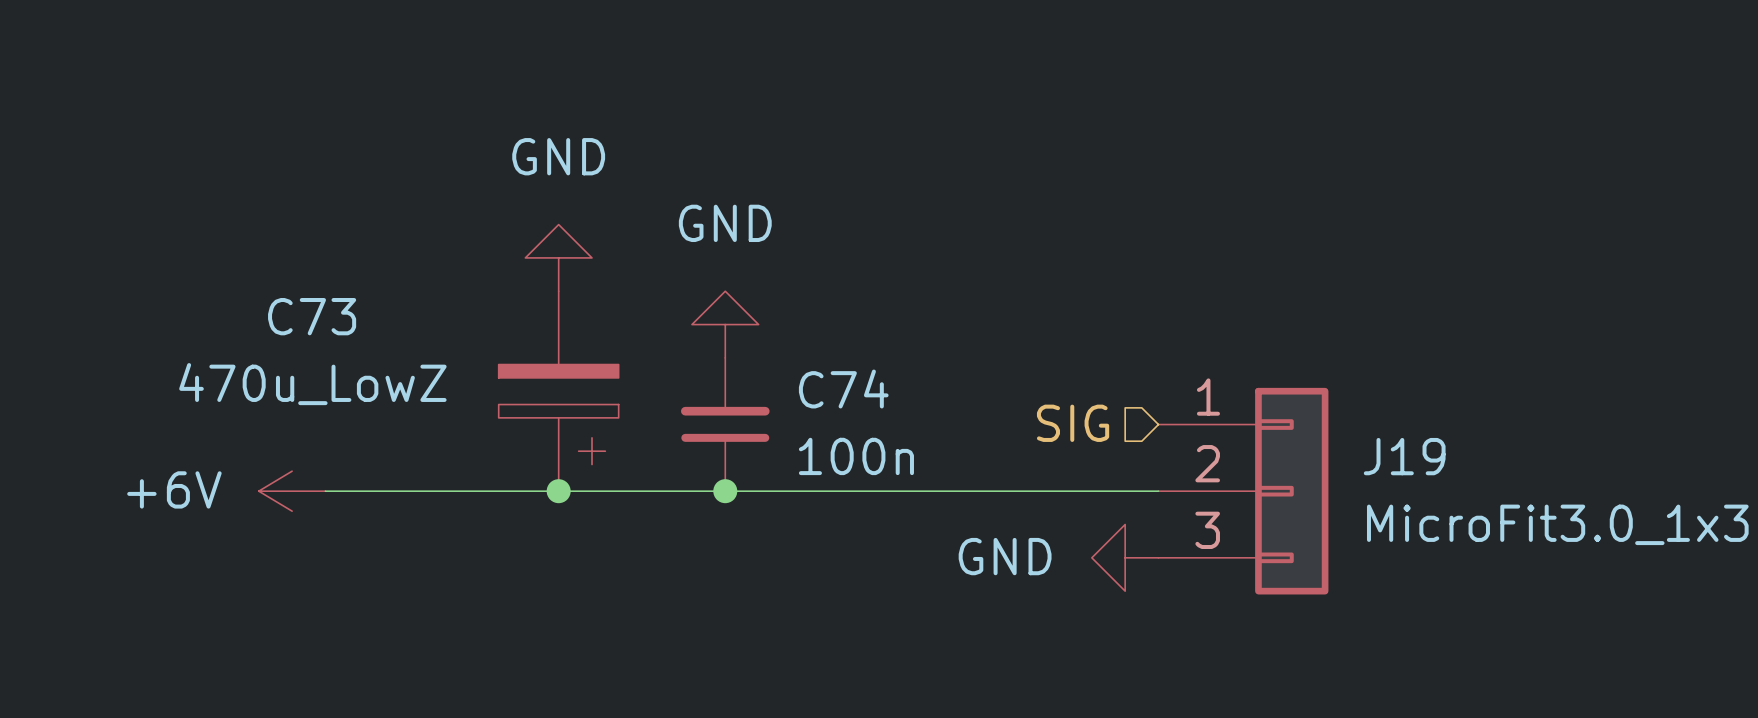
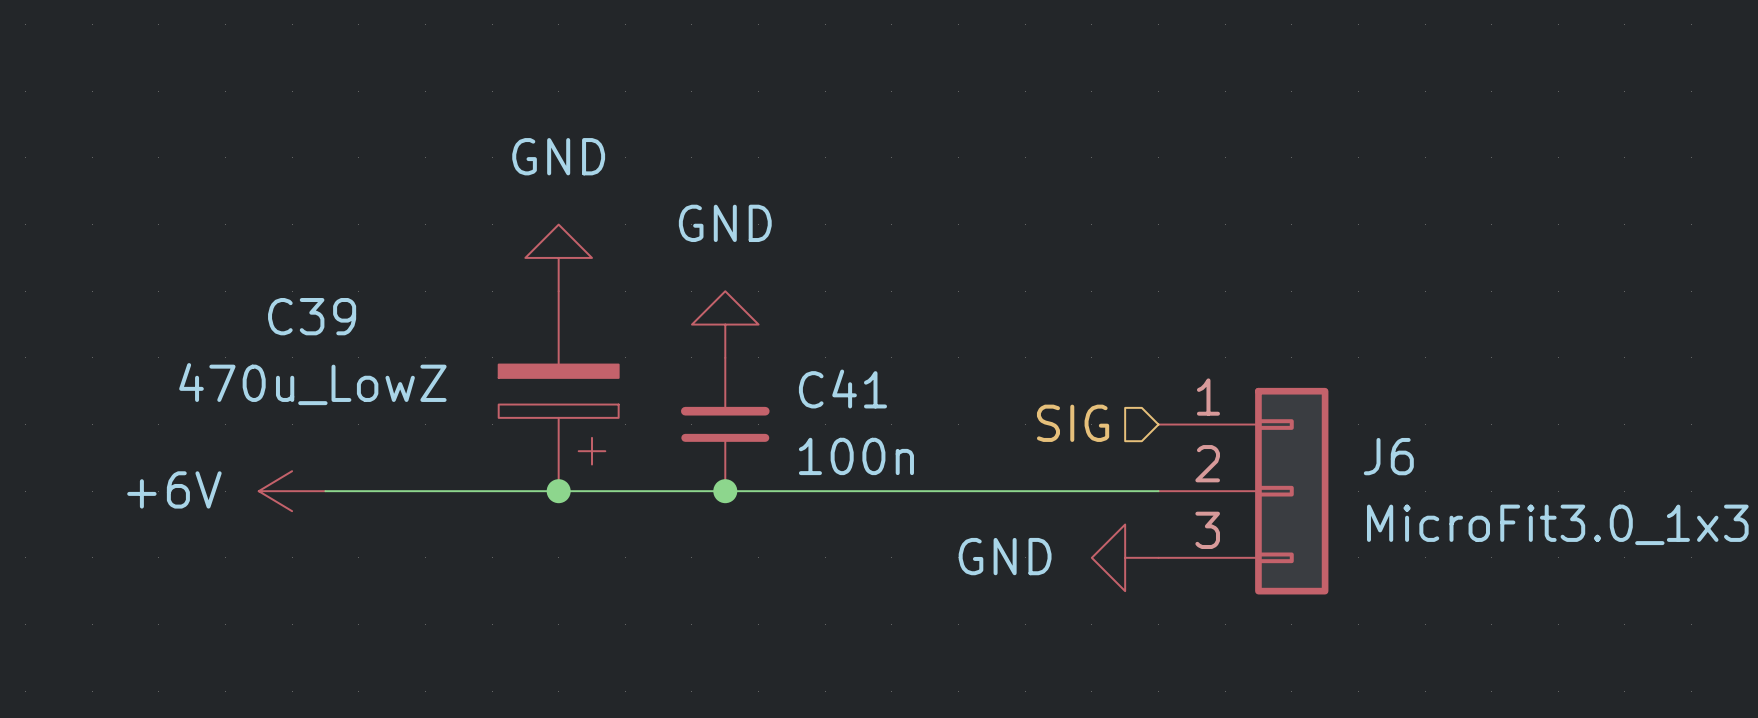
C73 name: C73 (312, 316) -> C39 (312, 316)
C74 name: C74 (843, 389) -> C41 (842, 389)
J19 name: J19 (1404, 456) -> J6 (1388, 456)

